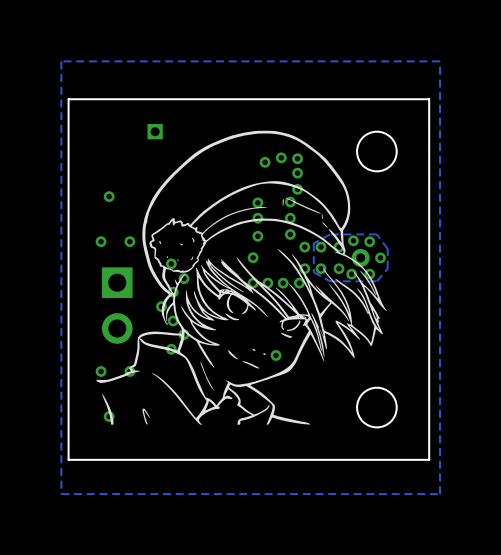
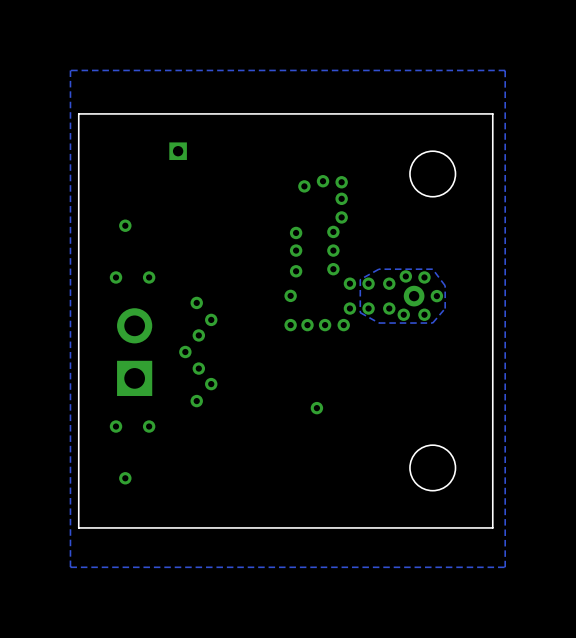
drawing: [96, 130, 387, 425] -> none
part rotation: 0° (117, 305) -> 180° (134, 352)

